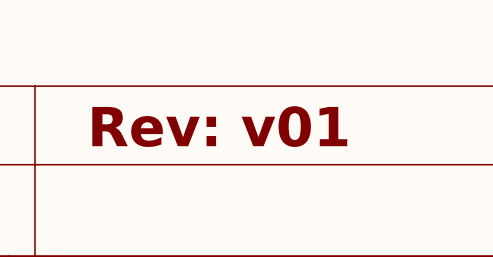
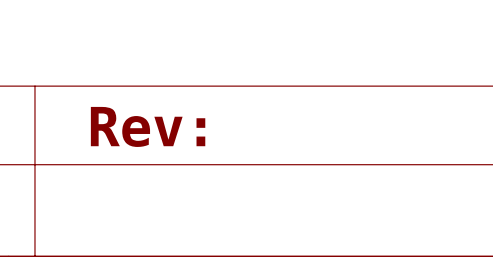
title block: Rev: v01 (219, 126) -> Rev: (148, 126)

